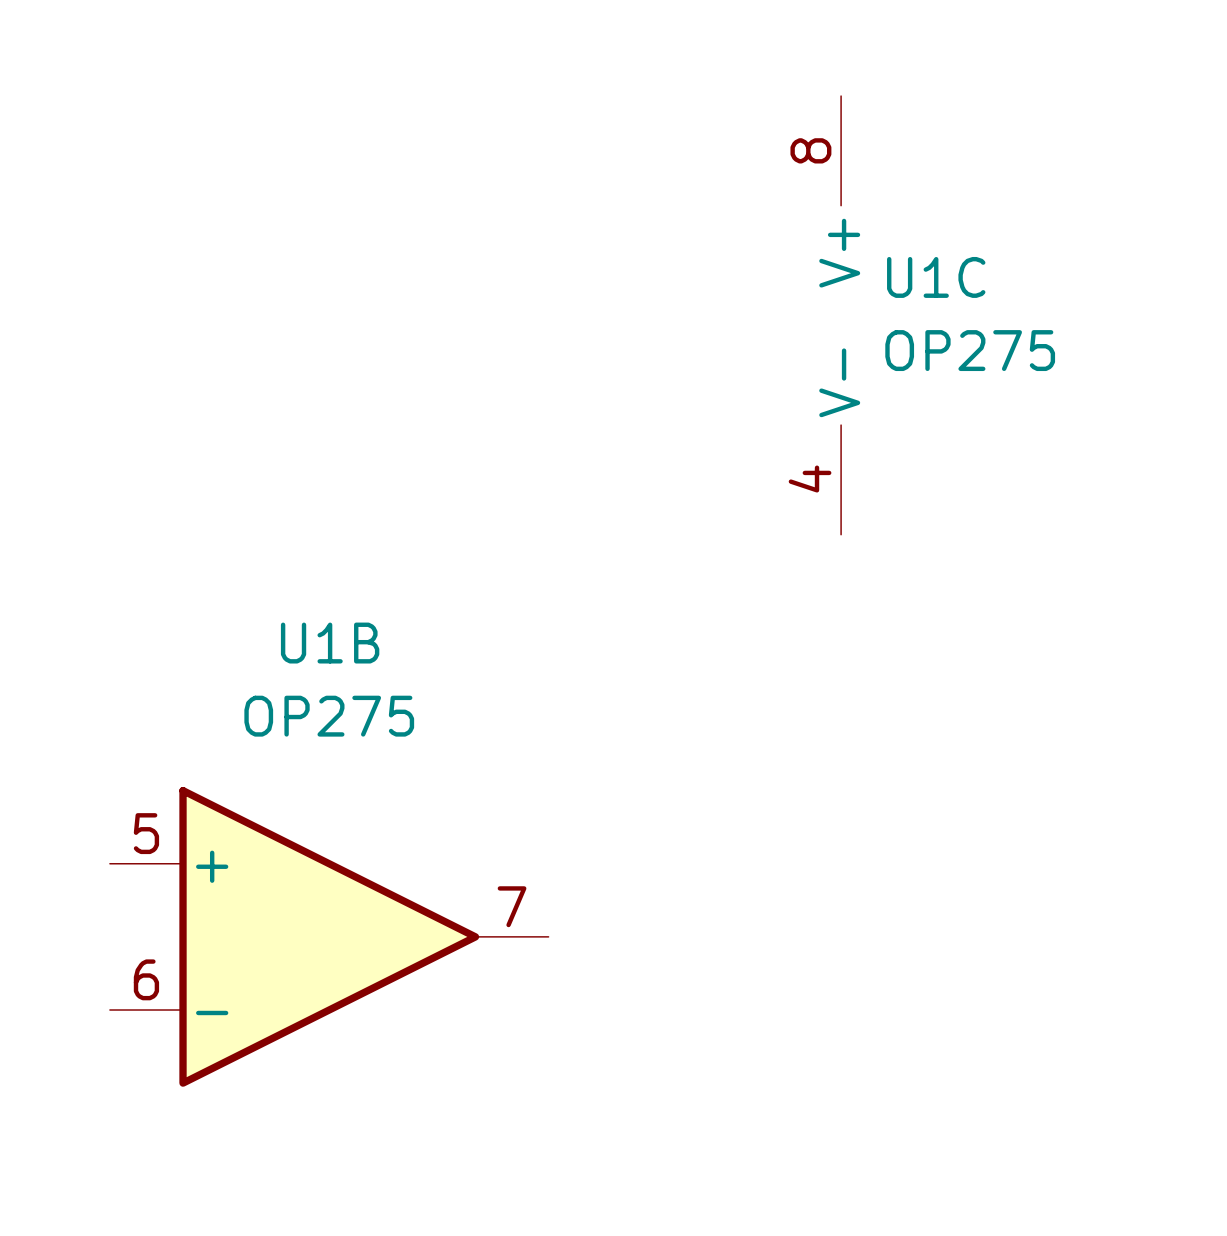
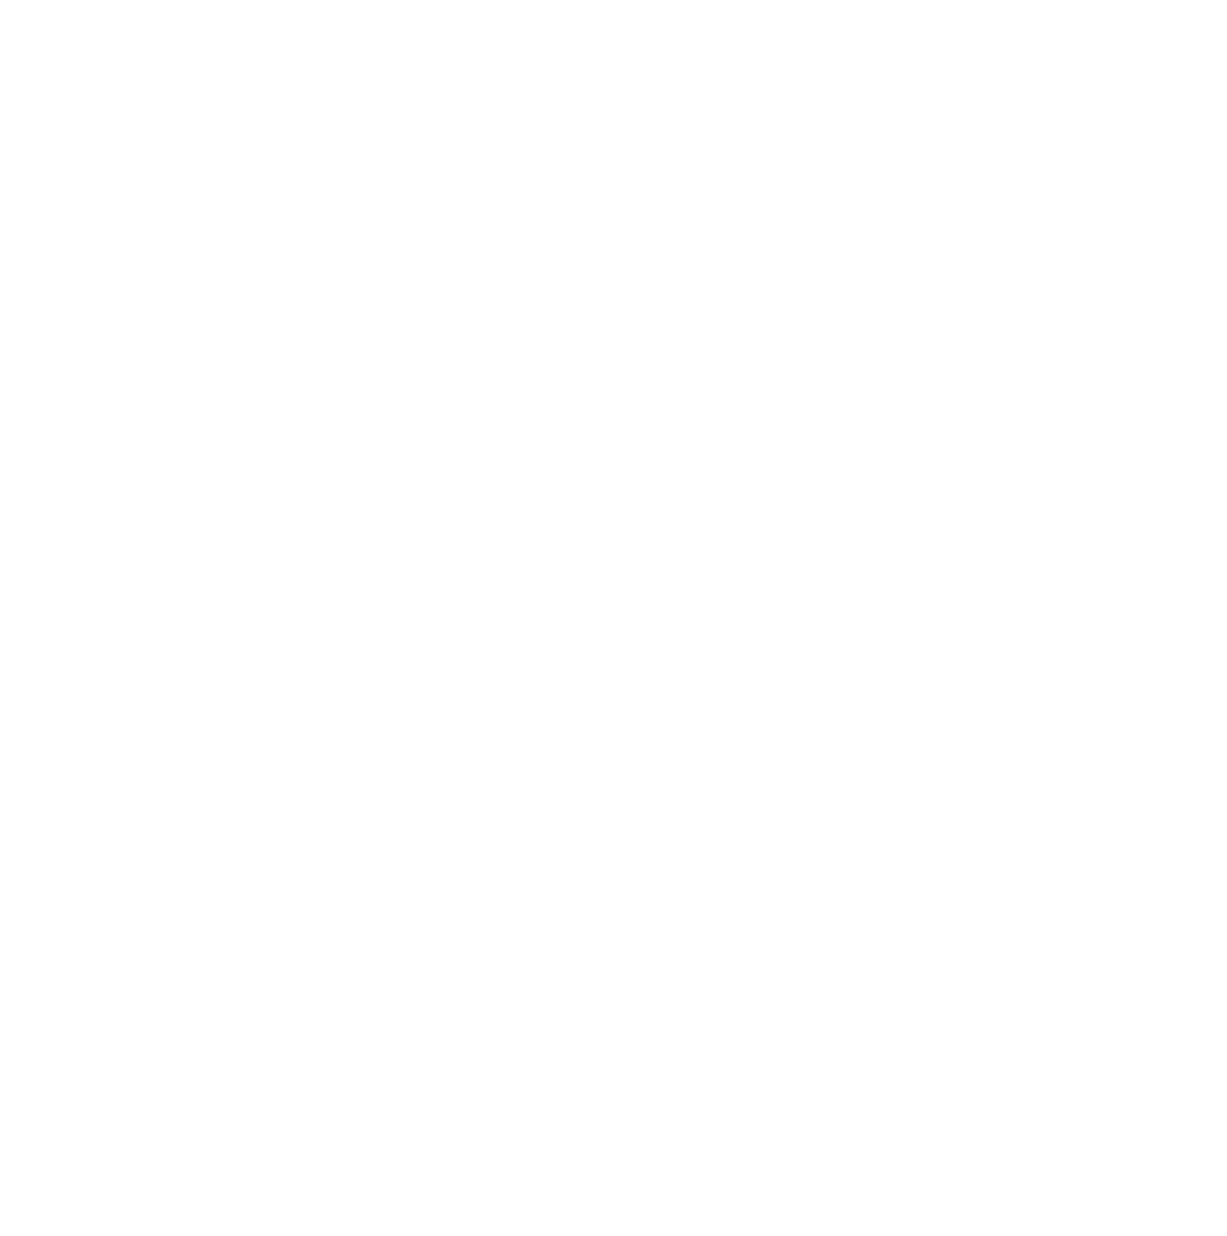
U1C: OP275 (841, 315) -> none
U1B: OP275 (329, 936) -> none

